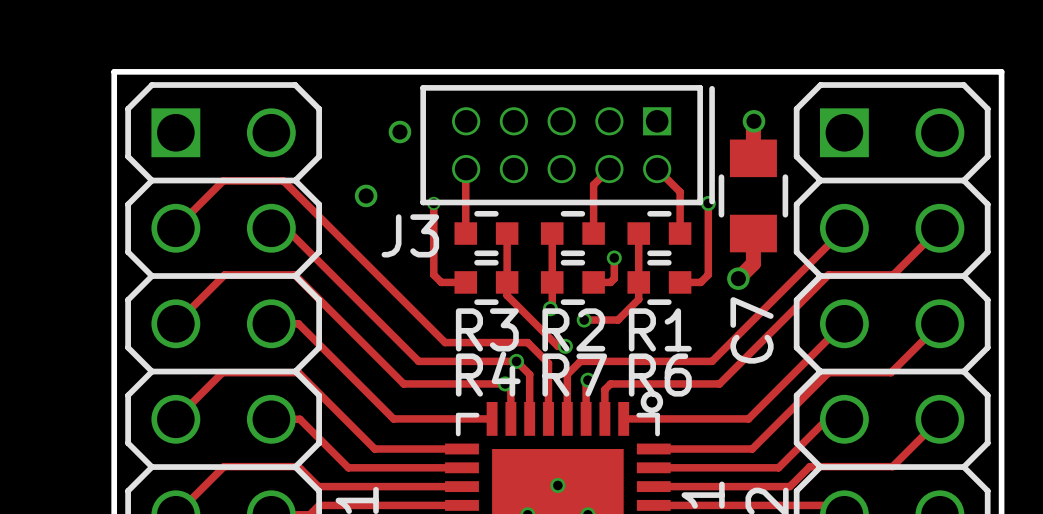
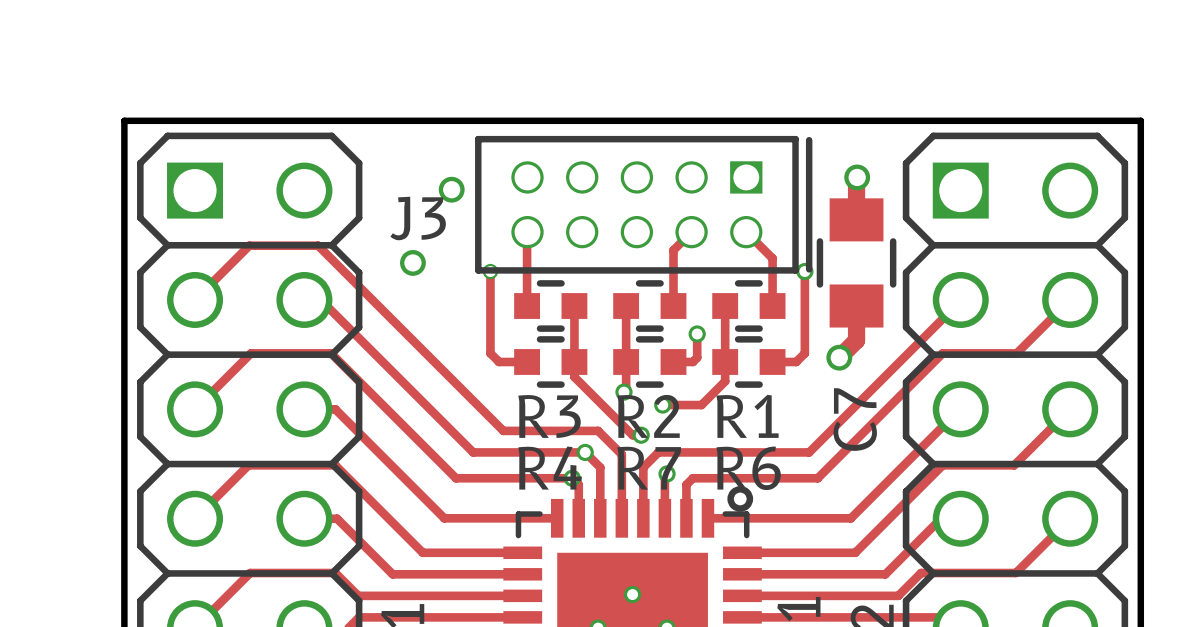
J3 name position: J3 (410, 235) -> J3 (418, 218)

